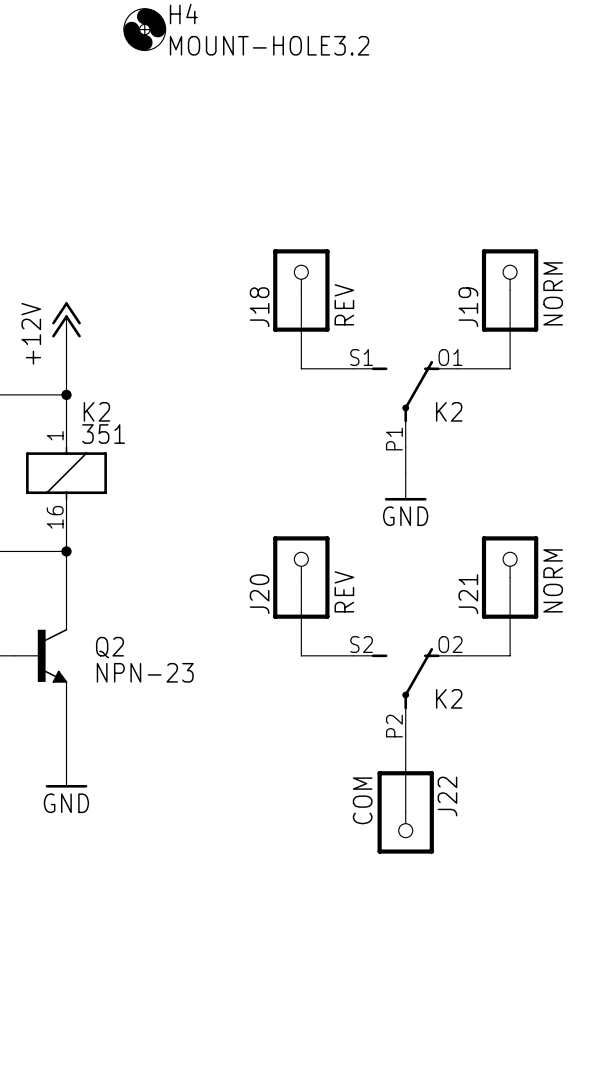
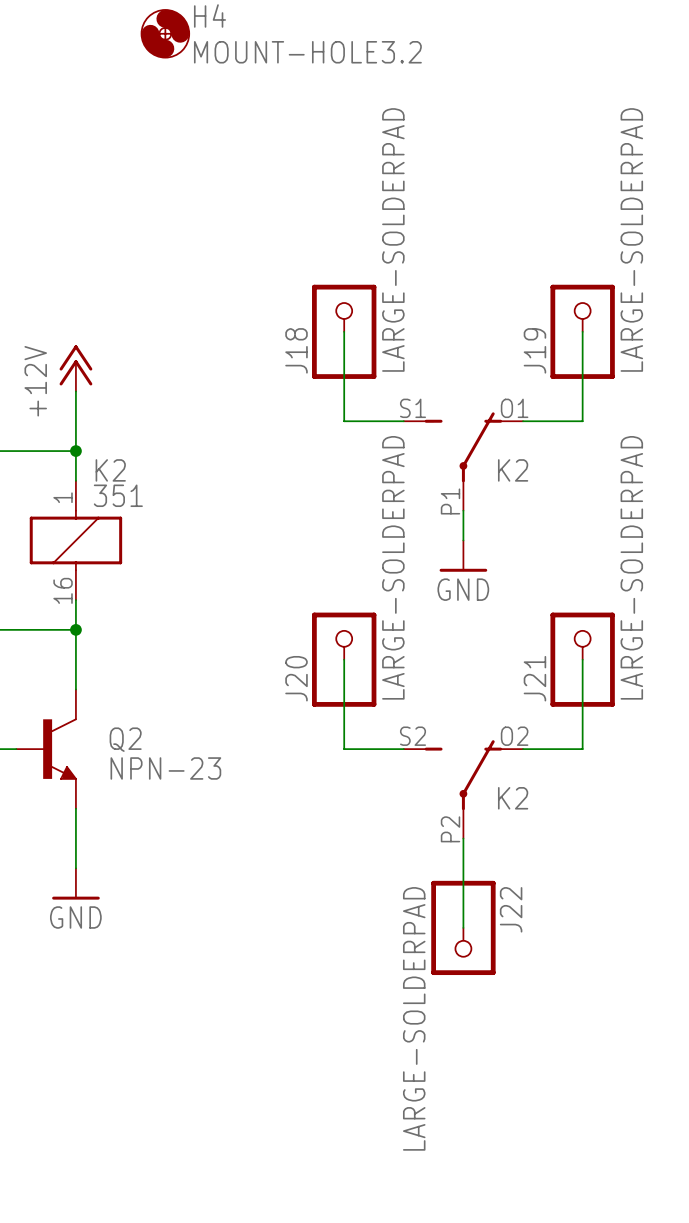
J19 value: NORM (553, 293) -> LARGE-SOLDERPAD (631, 239)
J18 value: REV (344, 304) -> LARGE-SOLDERPAD (393, 239)
J21 value: NORM (553, 580) -> LARGE-SOLDERPAD (631, 567)
J20 value: REV (344, 591) -> LARGE-SOLDERPAD (393, 567)
J22 value: COM (362, 800) -> LARGE-SOLDERPAD (414, 1018)

